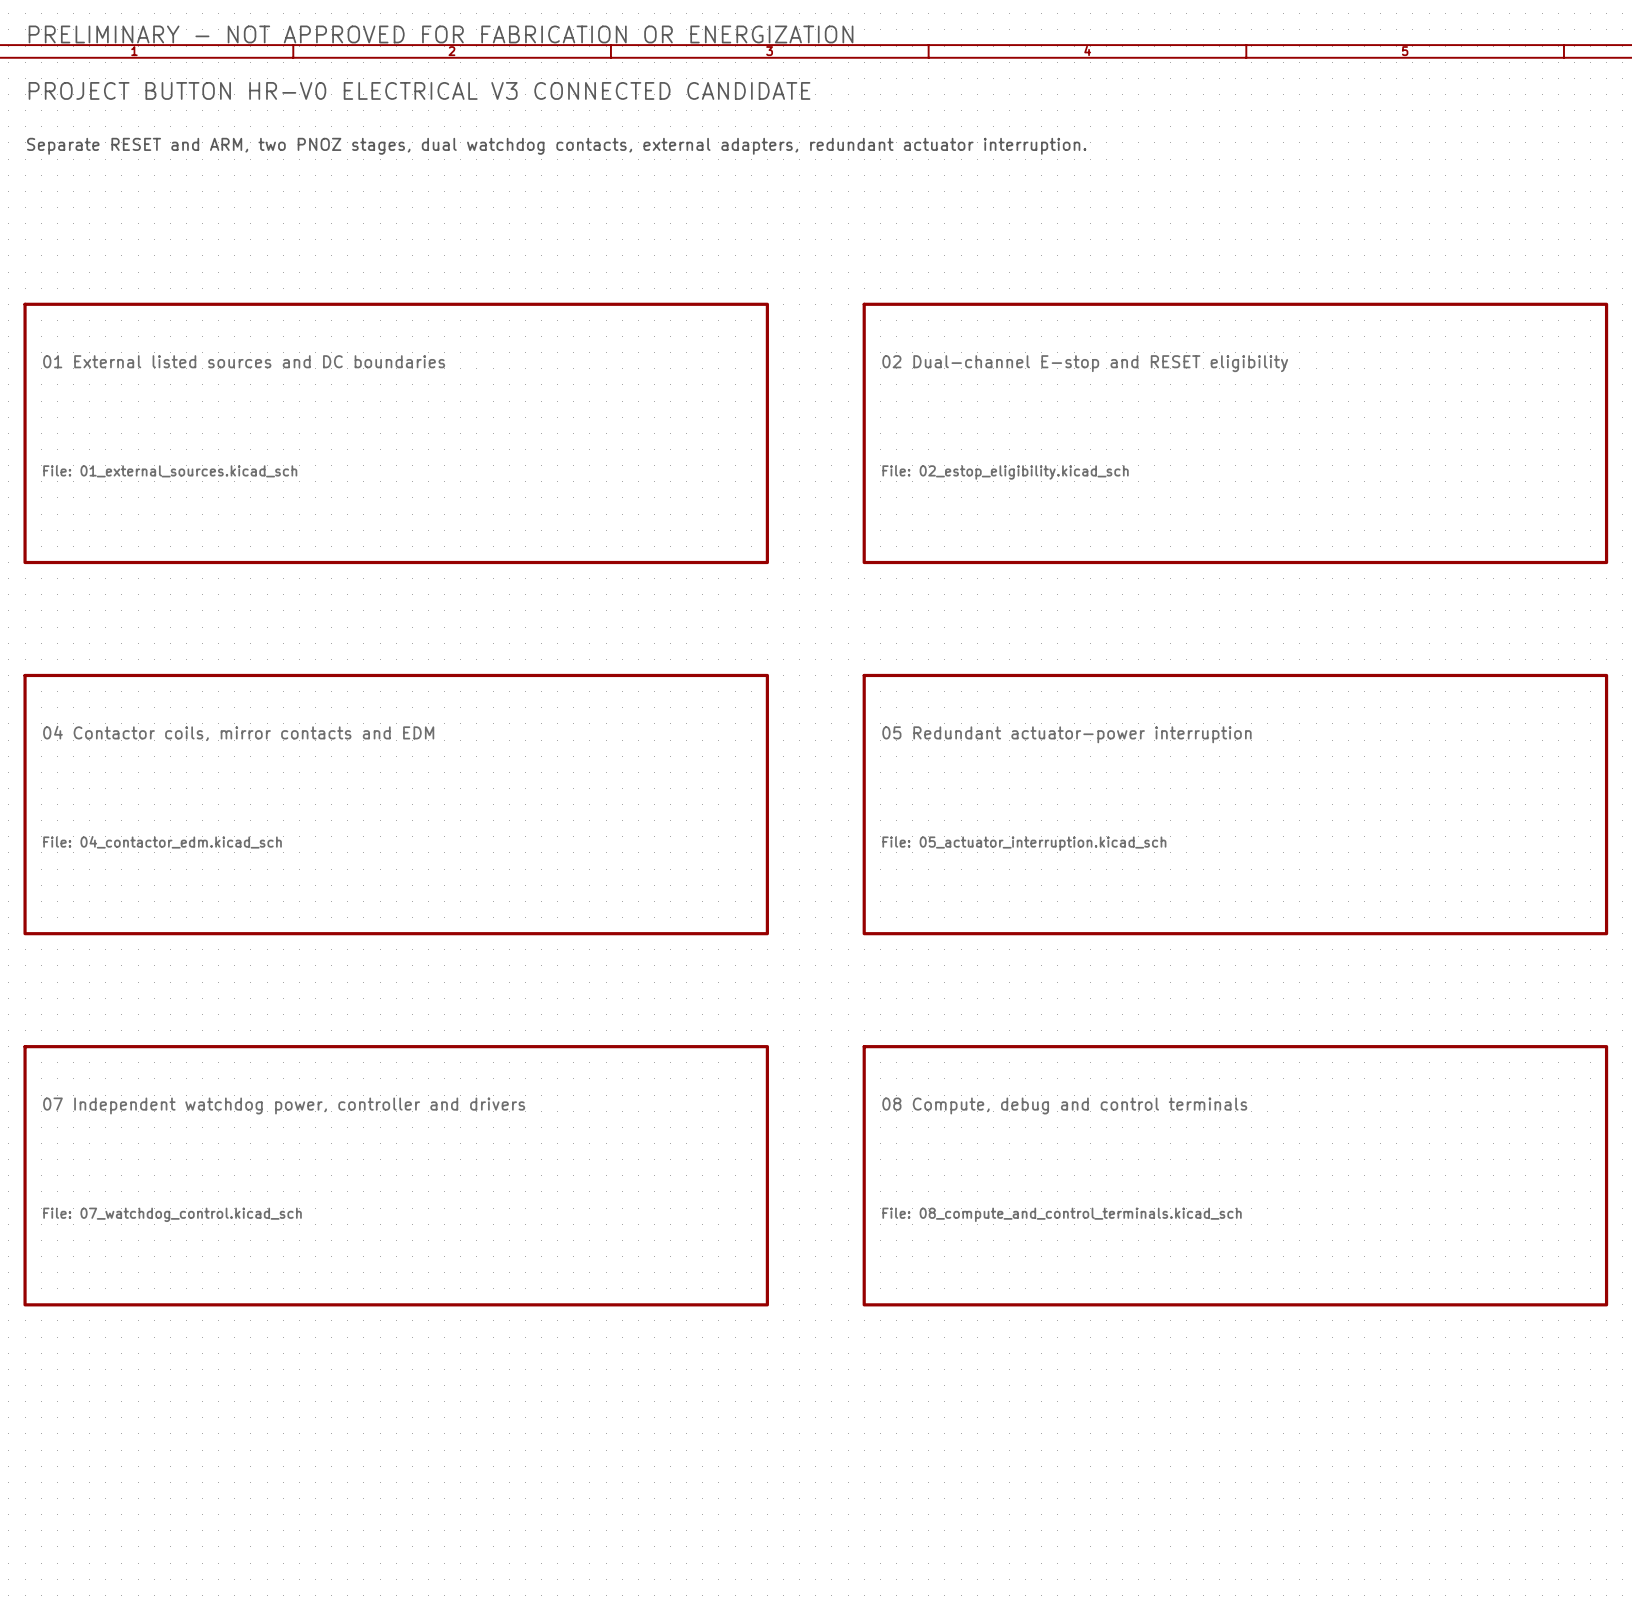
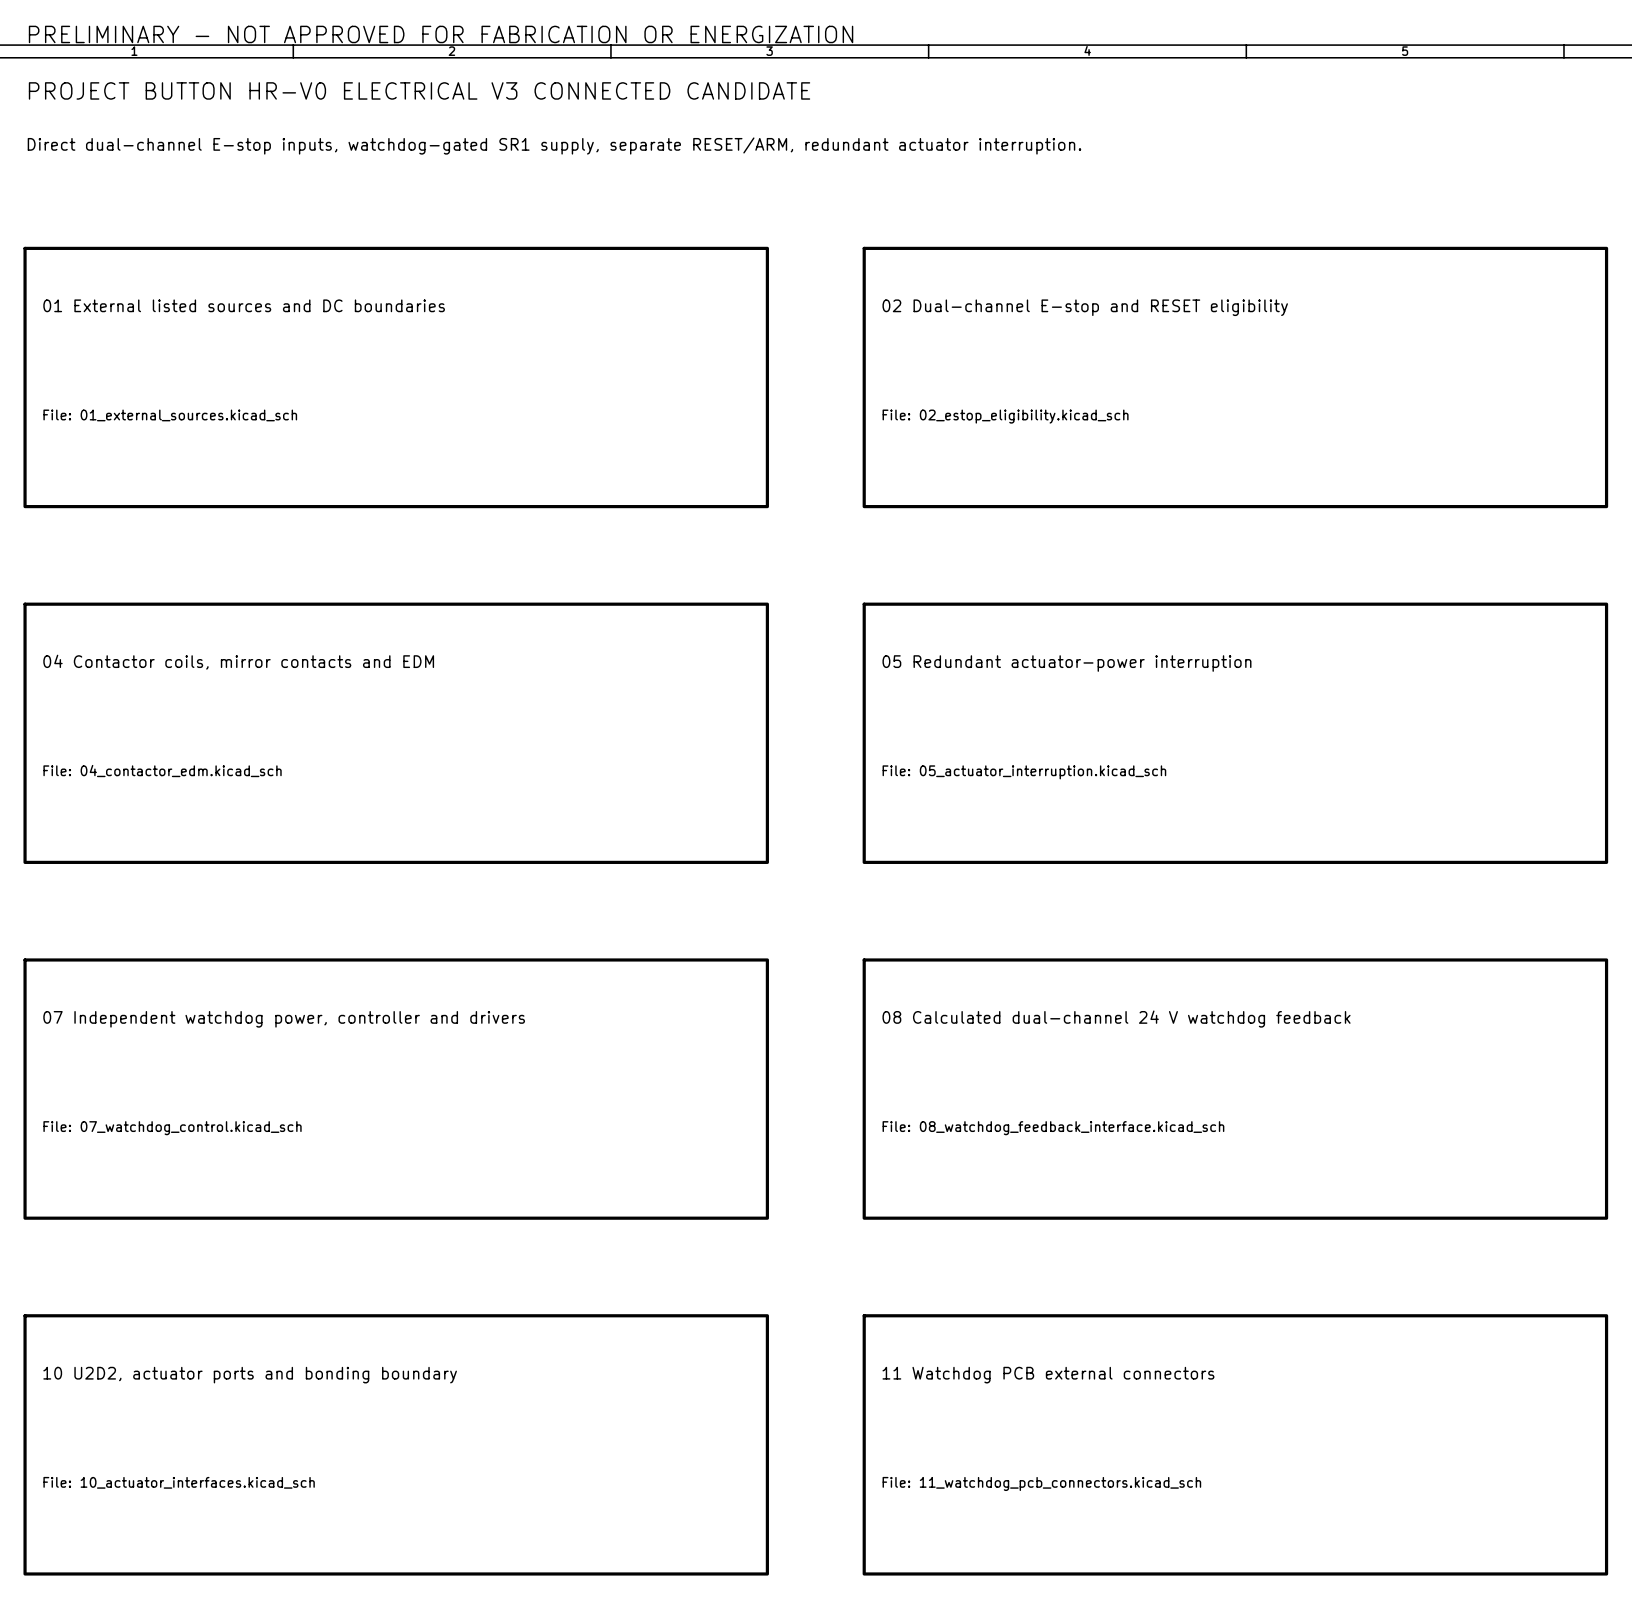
text: Separate RESET and ARM, two PNOZ stages, dual watchdog contacts, external adapters, redundant actuator interruption. (556, 146) -> Direct dual-channel E-stop inputs, watchdog-gated SR1 supply, separate RESET/ARM, redundant actuator interruption. (554, 146)
sheet 01 External listed sources and DC boundaries position: (396, 433) -> (396, 377)
sheet 02 Dual-channel E-stop and RESET eligibility position: (1235, 433) -> (1235, 377)
sheet 04 Contactor coils, mirror contacts and EDM position: (396, 804) -> (396, 733)
sheet 05 Redundant actuator-power interruption position: (1235, 804) -> (1235, 733)
sheet 08 Calculated dual-channel 24 V watchdog feedback: none -> File: 08_watchdog_feedback_interface.kicad_sch (1235, 1089)
sheet 07 Independent watchdog power, controller and drivers position: (396, 1175) -> (396, 1089)
sheet 08 Compute, debug and control terminals: File: 08_compute_and_control_terminals.kicad_sch (1235, 1175) -> none
sheet 10 U2D2, actuator ports and bonding boundary: none -> File: 10_actuator_interfaces.kicad_sch (396, 1444)
sheet 11 Watchdog PCB external connectors: none -> File: 11_watchdog_pcb_connectors.kicad_sch (1235, 1444)

